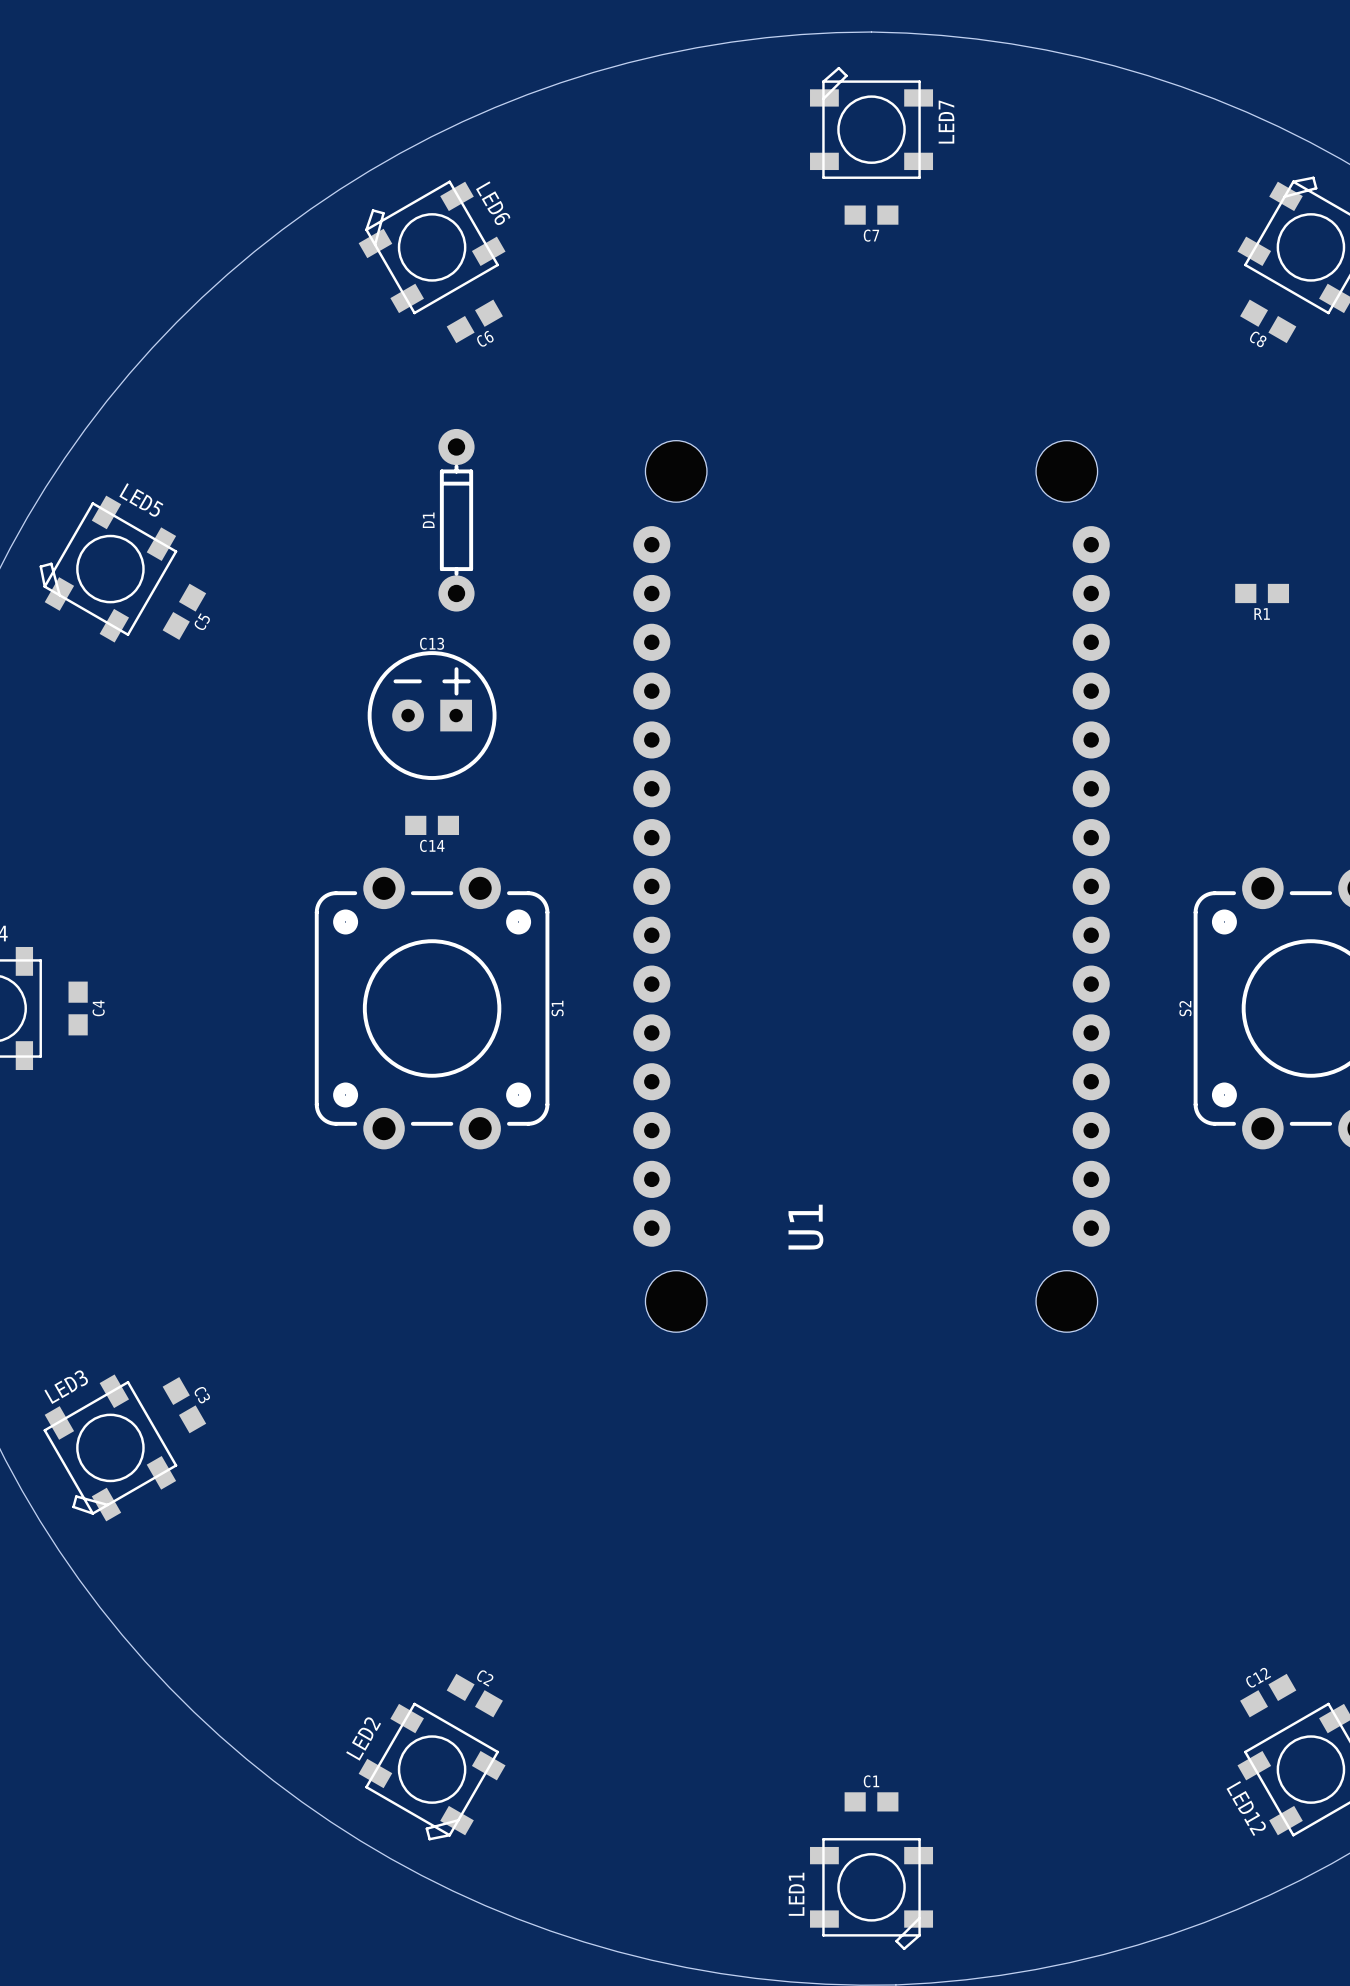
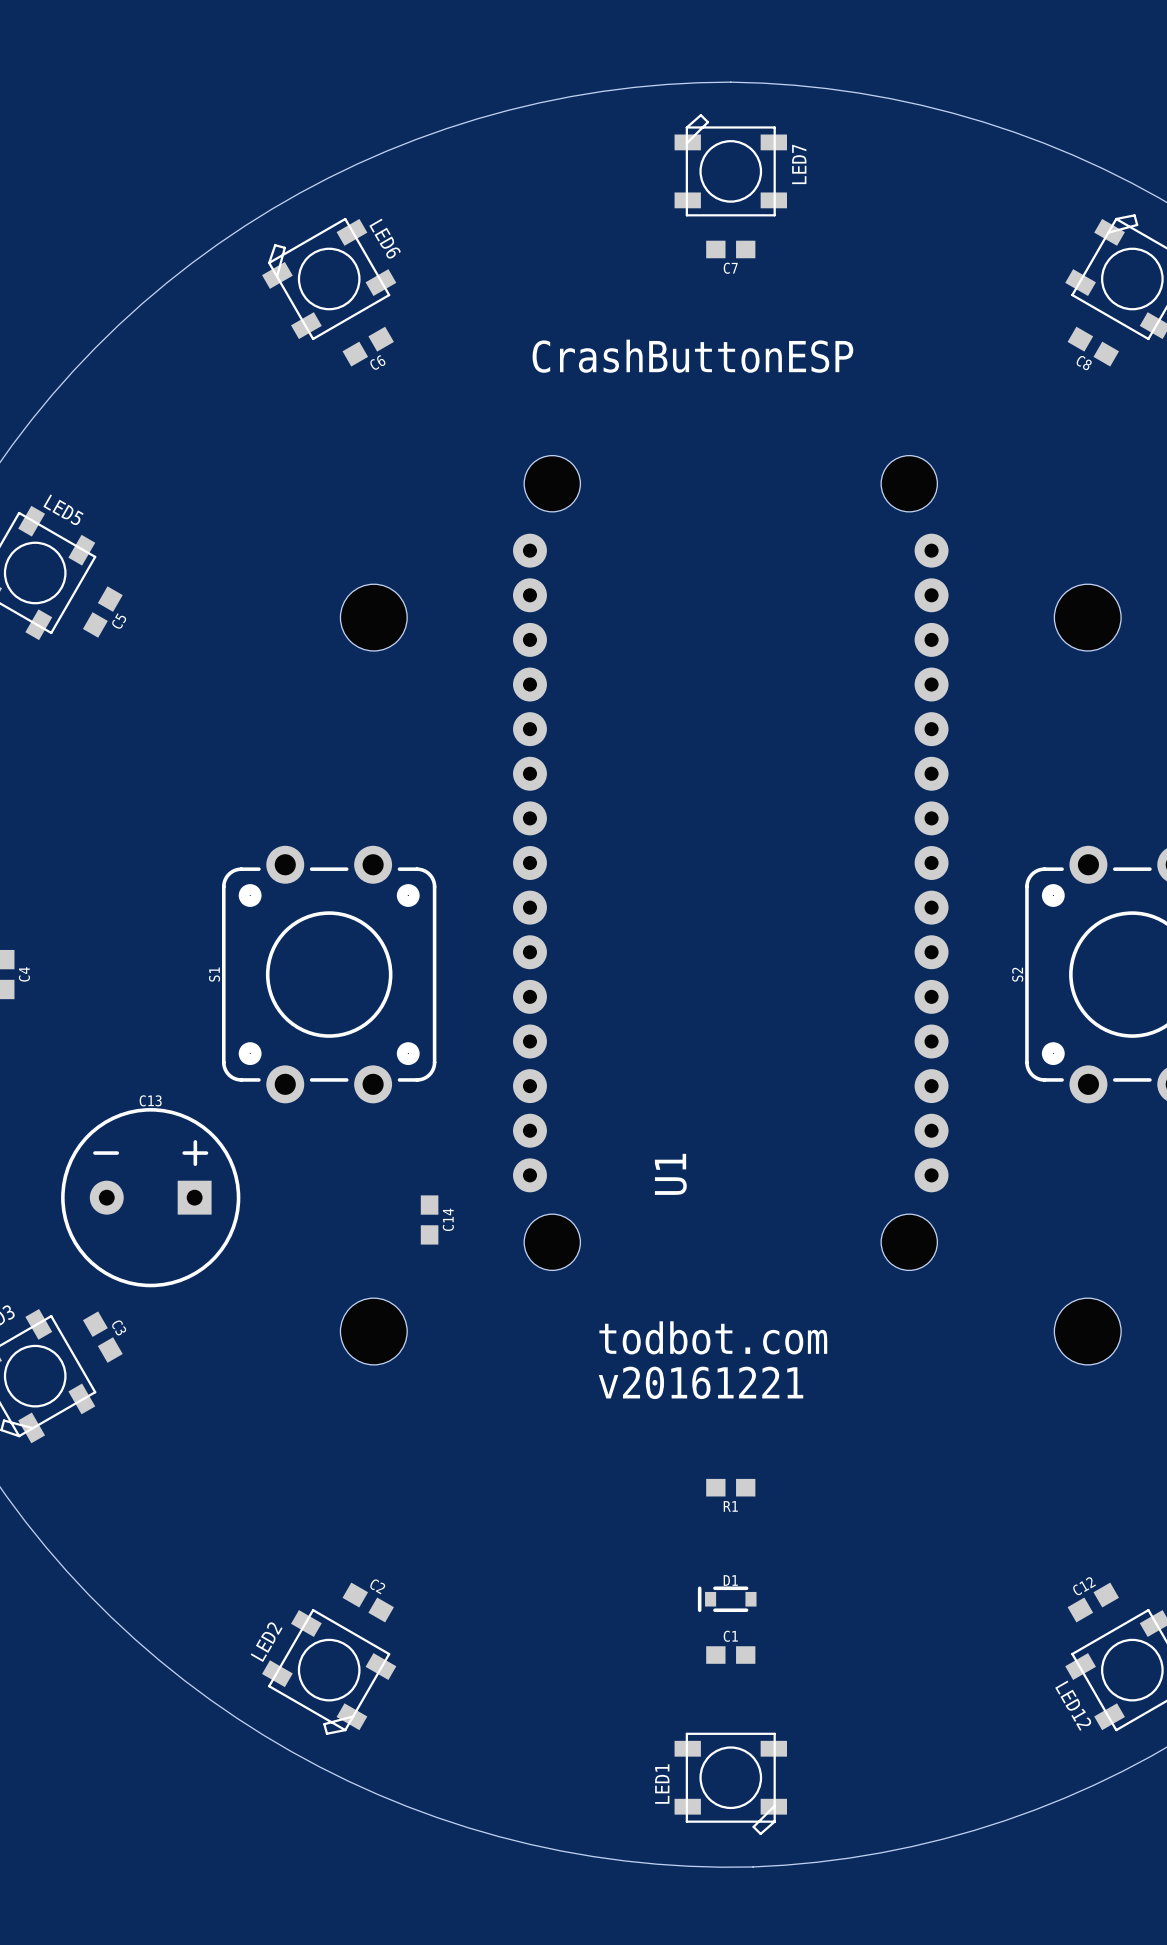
text: none -> CrashButtonESP (692, 356)
D1 footprint: [438, 428, 475, 612] -> [697, 1586, 757, 1613]
R1 position: (1262, 593) -> (730, 1487)
hole: none -> (373, 617)
hole: none -> (1087, 617)
C13 footprint: [367, 651, 497, 780] -> [61, 1108, 241, 1288]
C14 rotation: 0° (432, 825) -> 90° clockwise (429, 1219)
C14 position: (432, 825) -> (429, 1219)
S1 name position: S1 (557, 1008) -> S1 (214, 974)
hole: none -> (373, 1331)
hole: none -> (1087, 1331)
text: none -> todbot.com (713, 1337)
text: none -> v20161221 (701, 1382)
C1 position: (871, 1801) -> (730, 1655)

